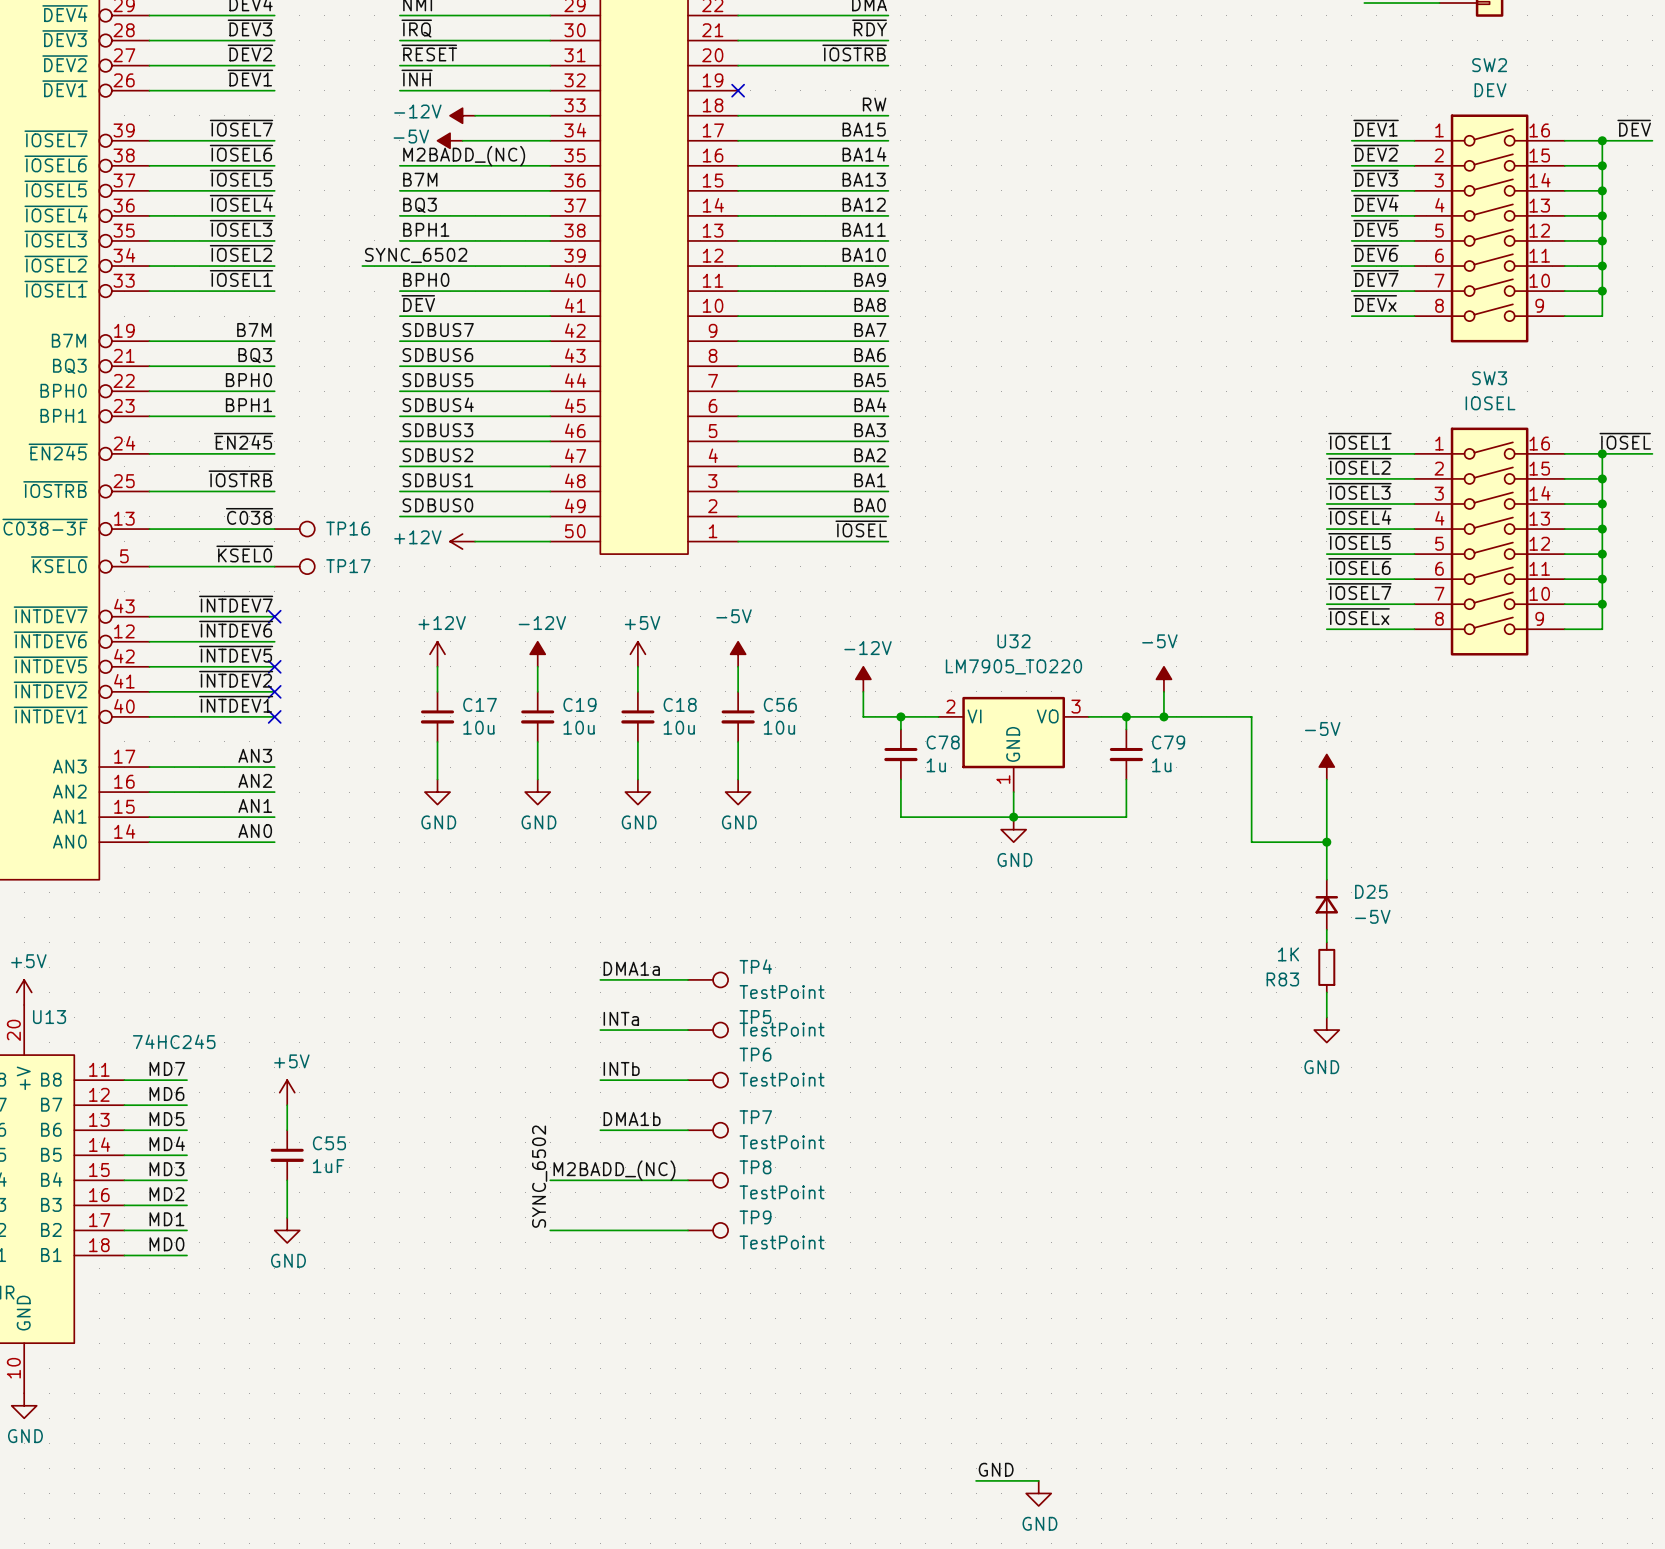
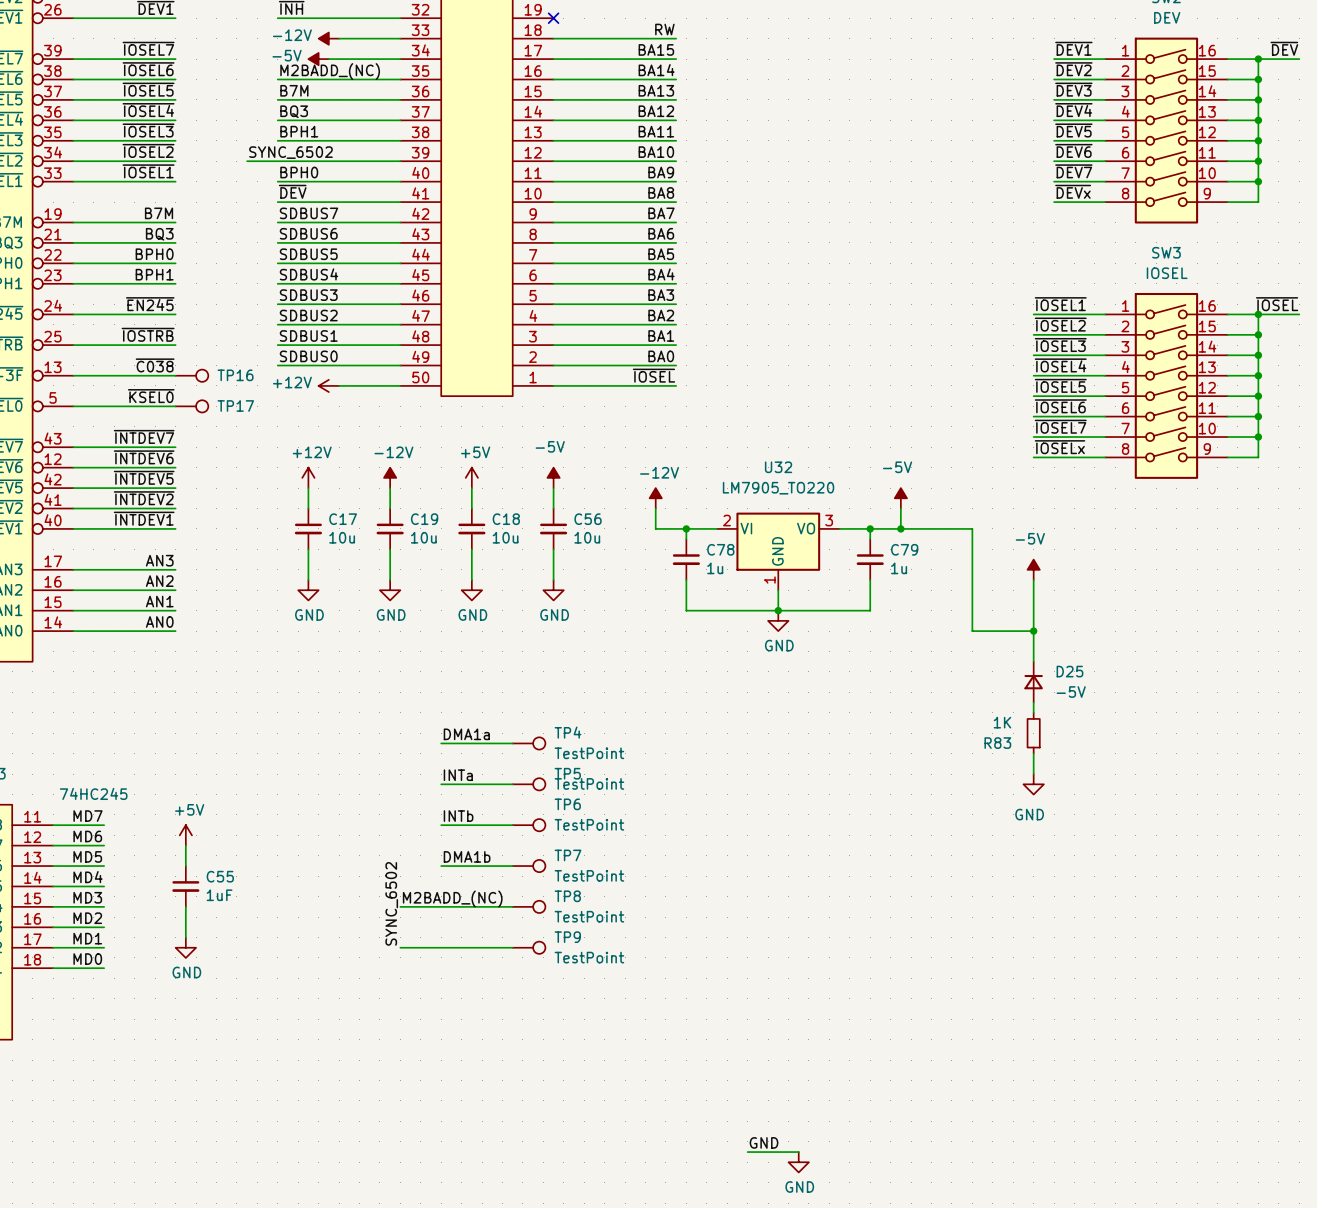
no-connect mark: (274, 616) -> none
no-connect mark: (274, 666) -> none
no-connect mark: (274, 691) -> none
no-connect mark: (274, 716) -> none

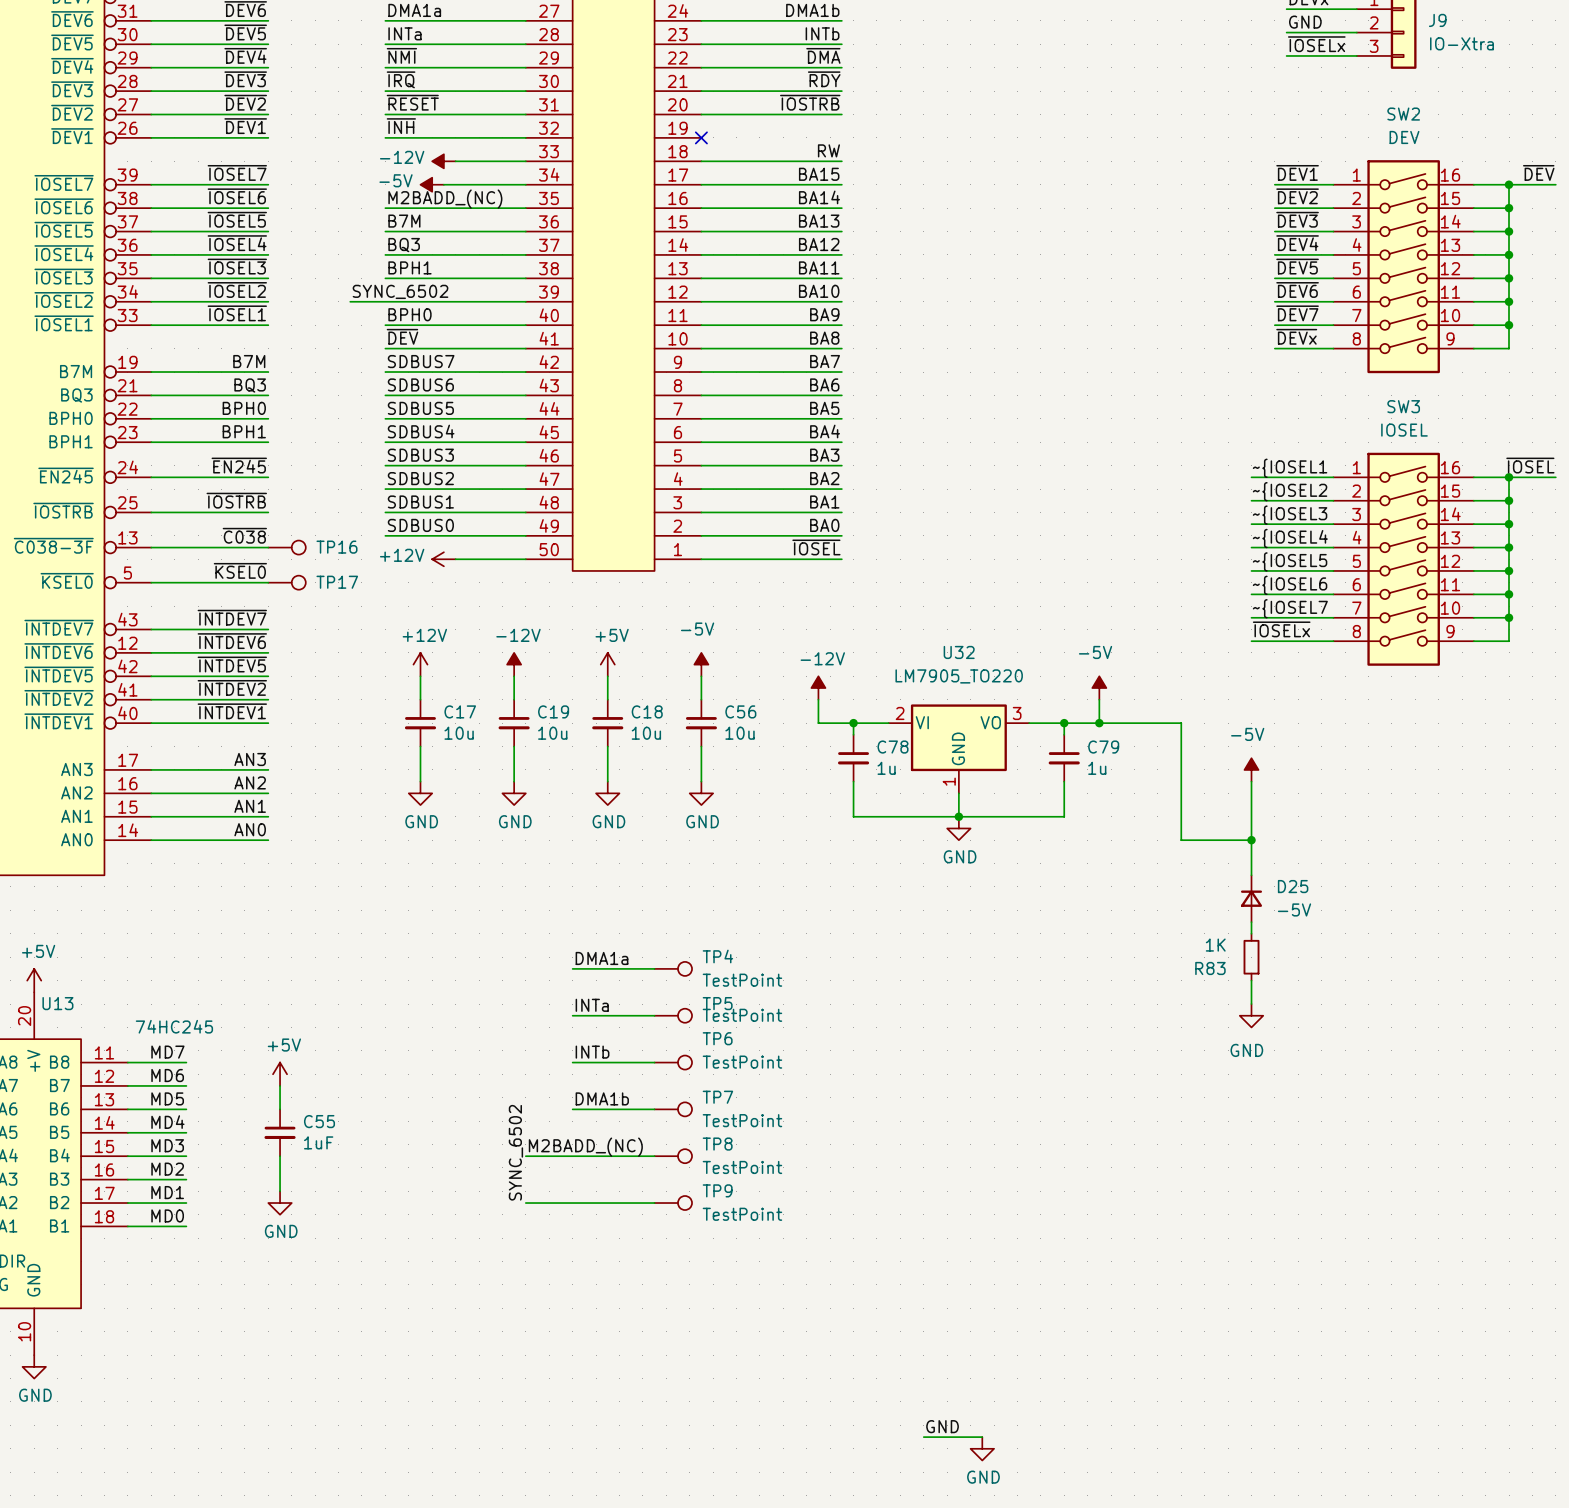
label: ~{IOSEL1} (1060, 304) -> ~{IOSEL1 (1290, 468)
label: ~{IOSEL2} (1060, 324) -> ~{IOSEL2 (1290, 491)
label: ~{IOSEL3} (1060, 345) -> ~{IOSEL3 (1290, 515)
label: ~{IOSEL4} (1060, 365) -> ~{IOSEL4 (1290, 538)
label: ~{IOSEL5} (1060, 385) -> ~{IOSEL5 (1290, 561)
label: ~{IOSEL6} (1060, 406) -> ~{IOSEL6 (1290, 585)
label: ~{IOSEL7} (1060, 426) -> ~{IOSEL7 (1290, 608)

